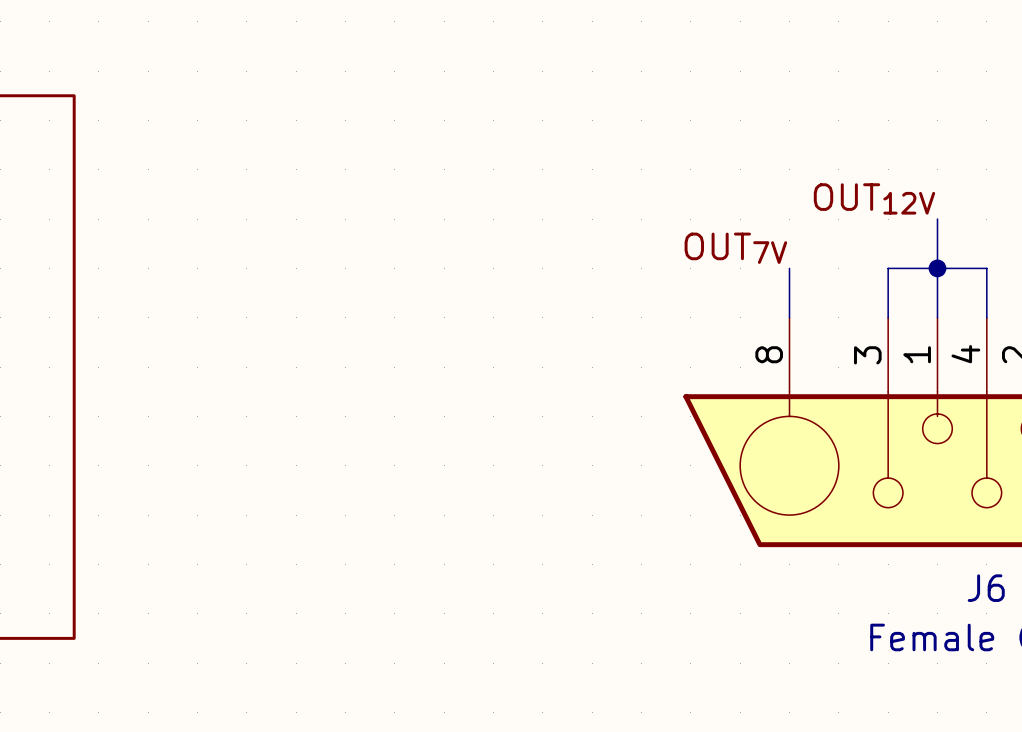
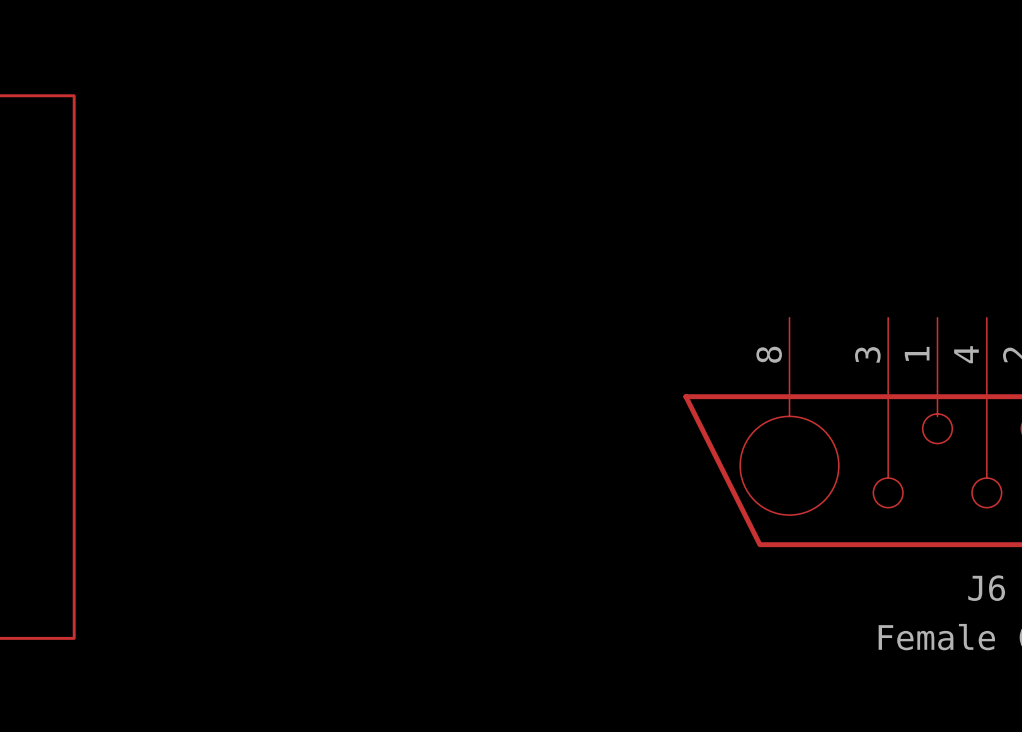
label: OUT12V (874, 198) -> none
wire: (937, 219) (937, 317) -> none
label: OUT7V (735, 248) -> none
wire: (789, 268) (789, 317) -> none
junction: (937, 268) -> none
wire: (888, 317) (888, 268) (986, 268) (986, 317) -> none

